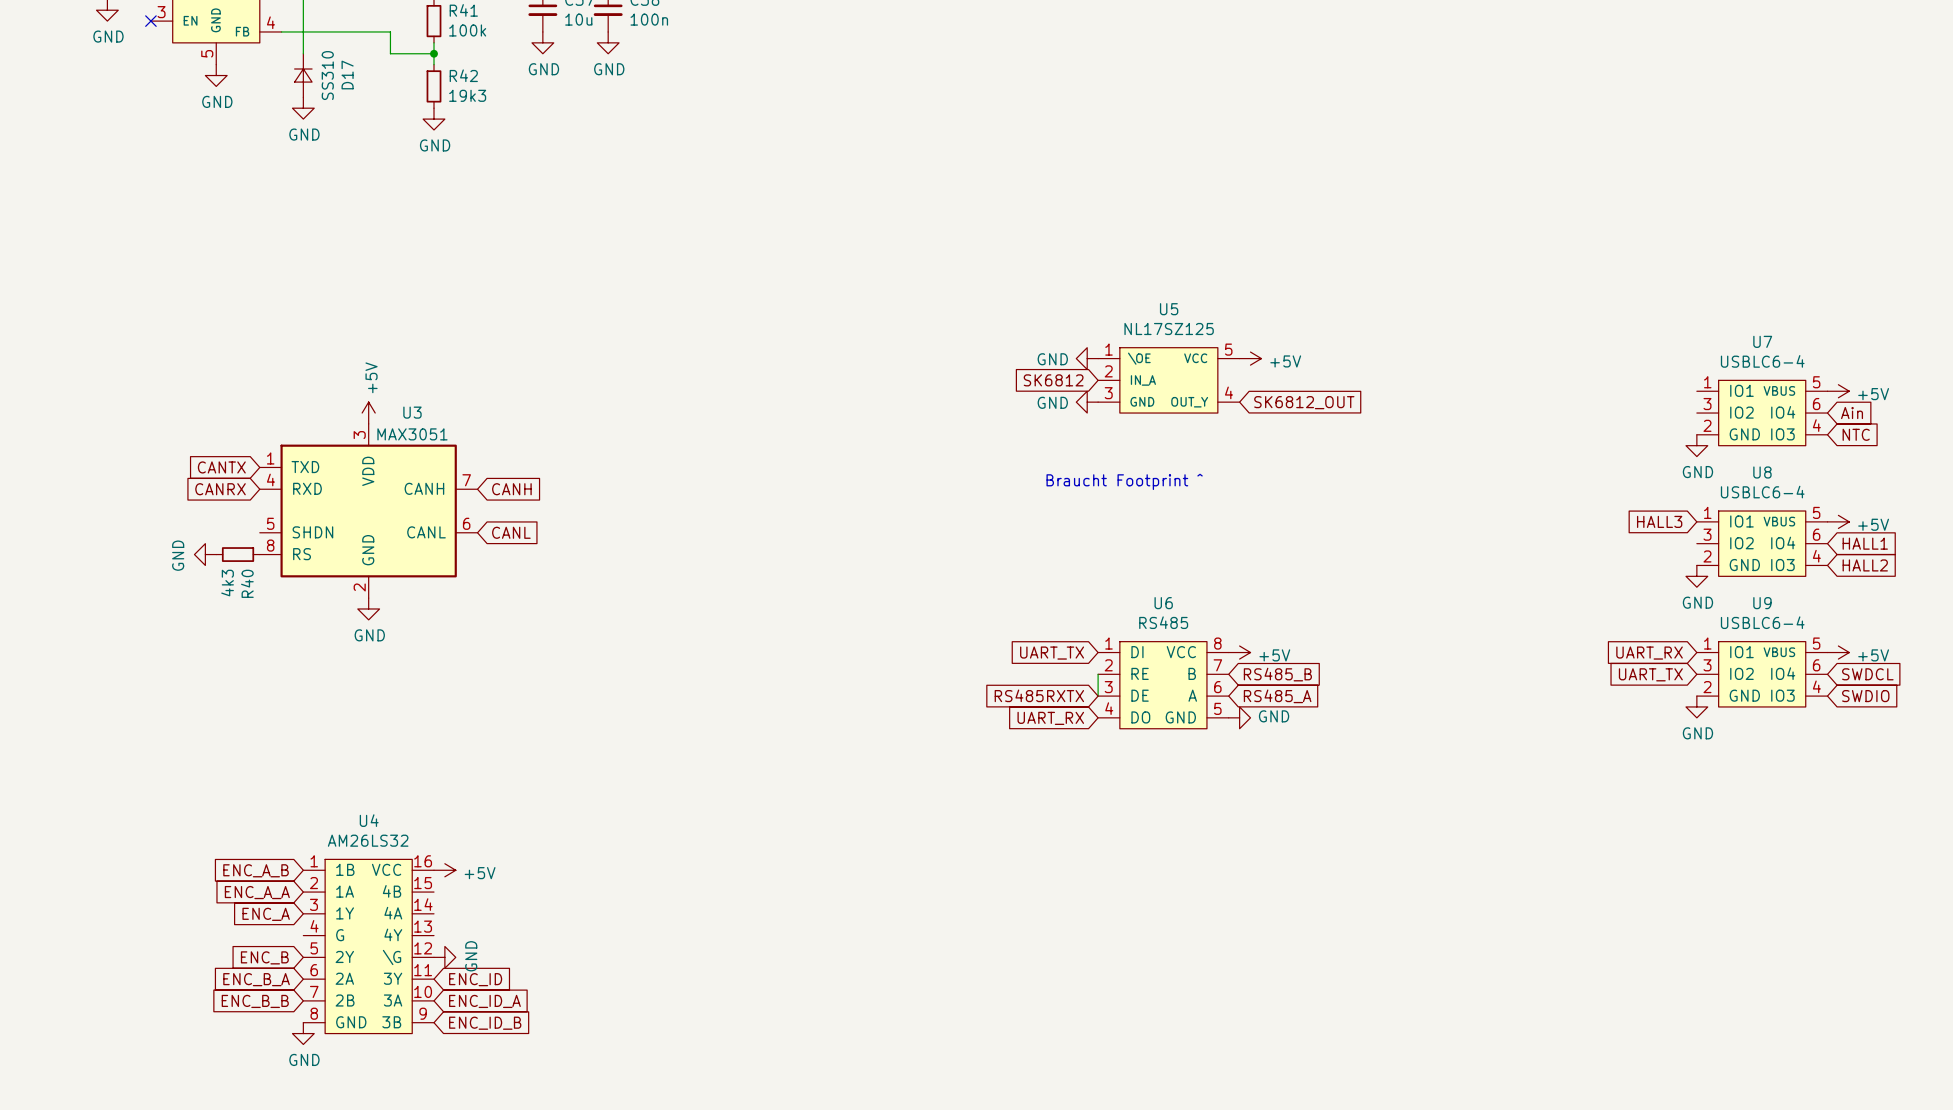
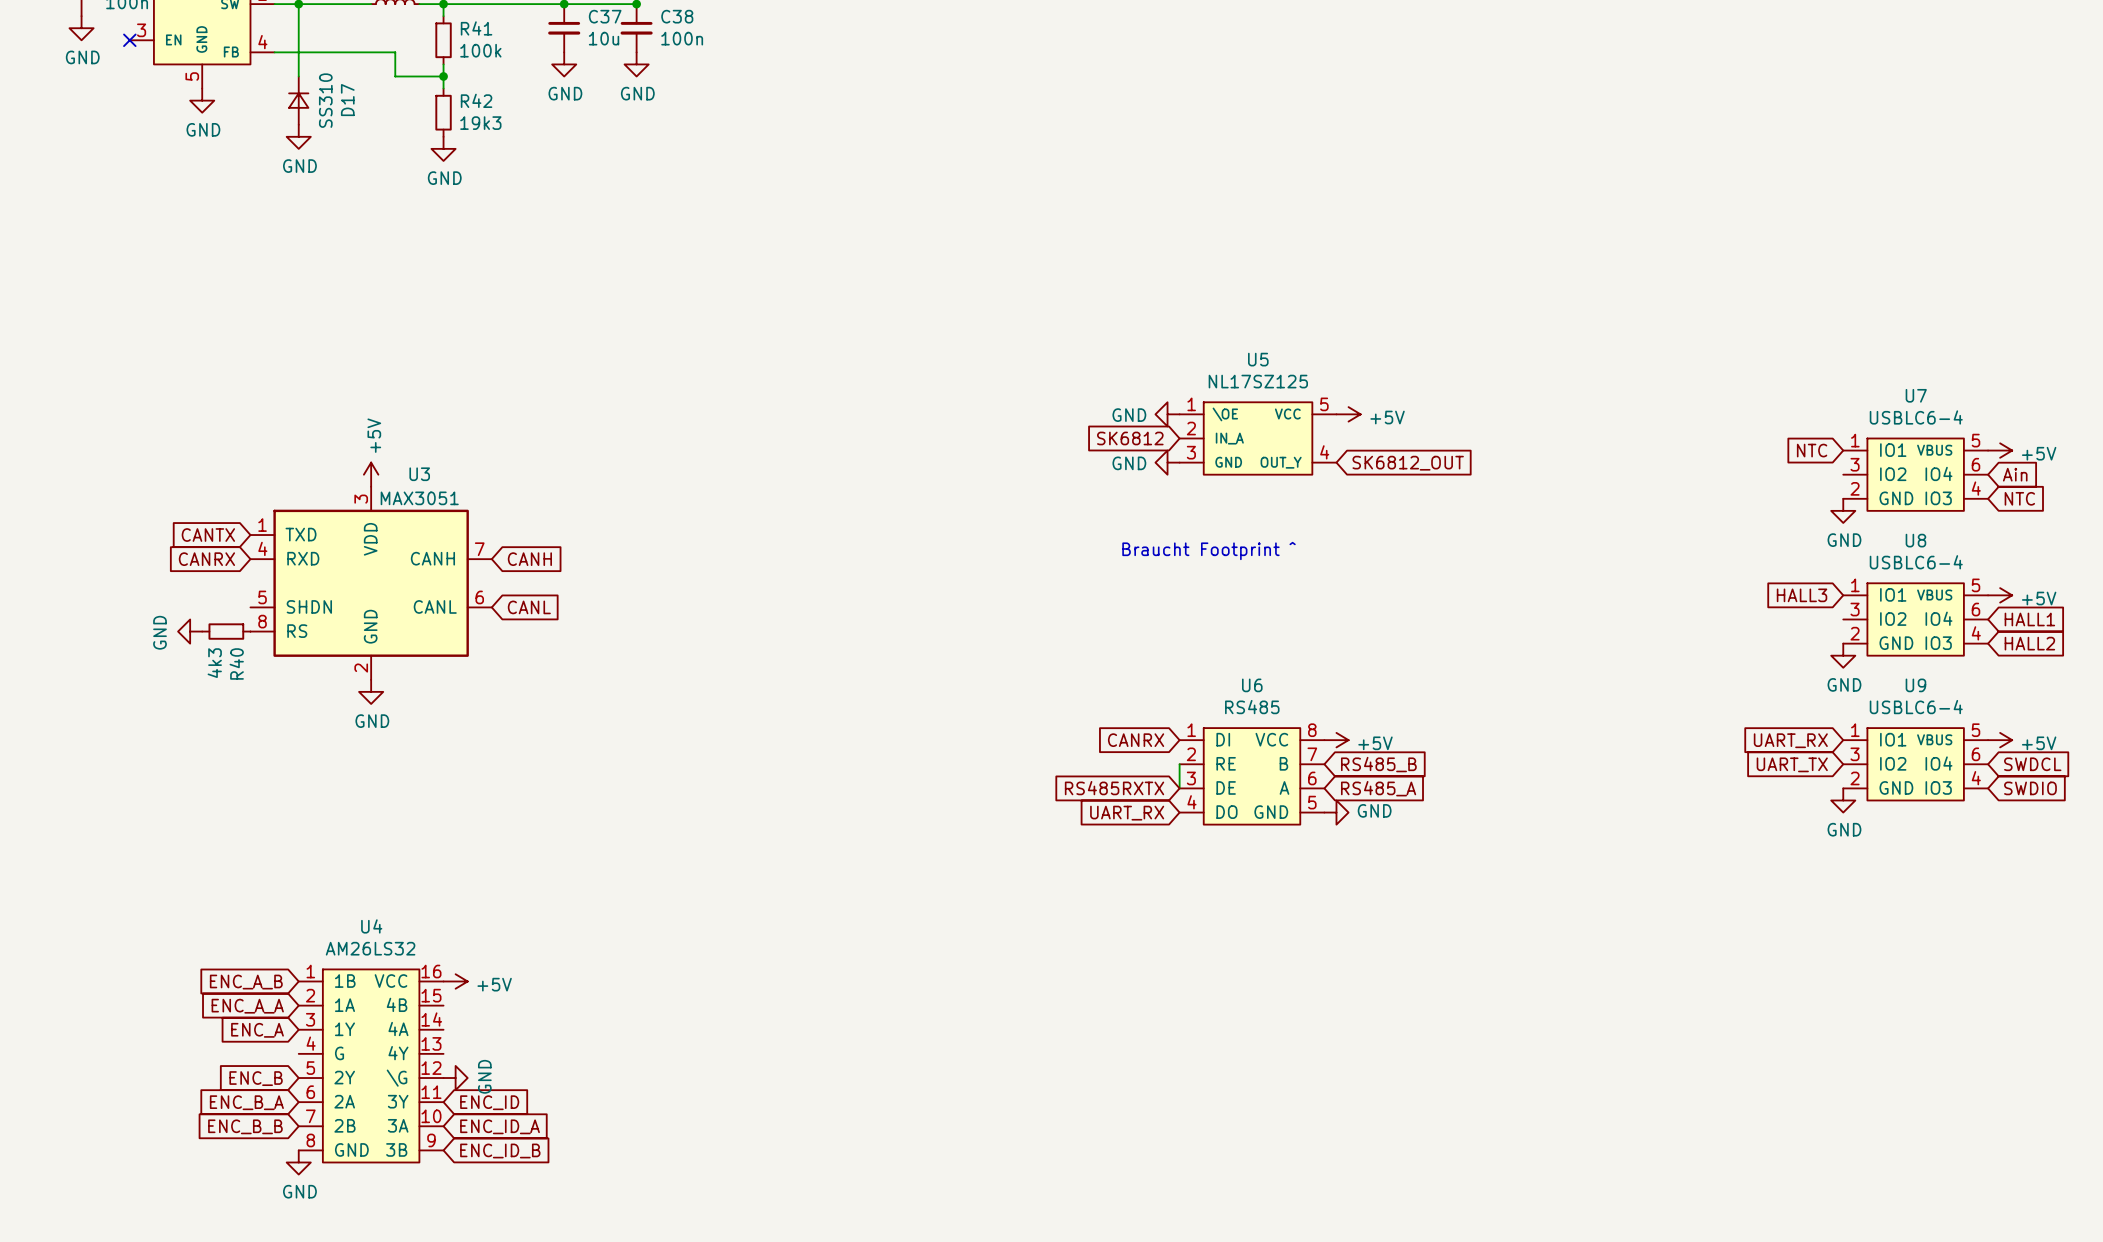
global label: none -> NTC (1812, 450)
global label: UART_TX (1052, 653) -> CANRX (1136, 740)

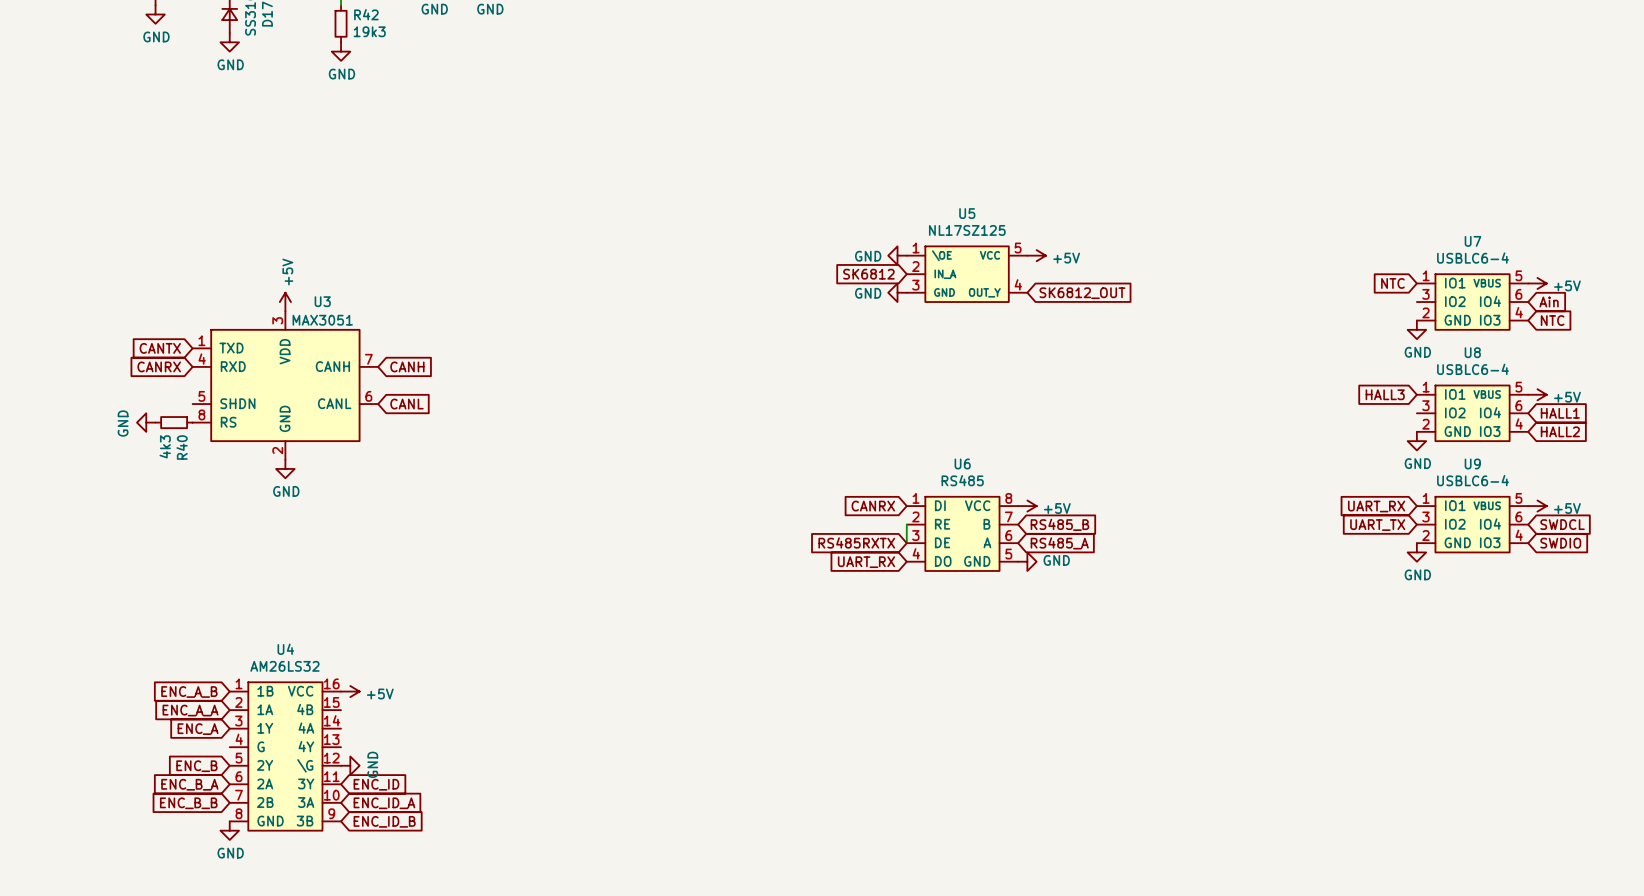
text: Braucht Footprint ^ (1209, 550) -> none

